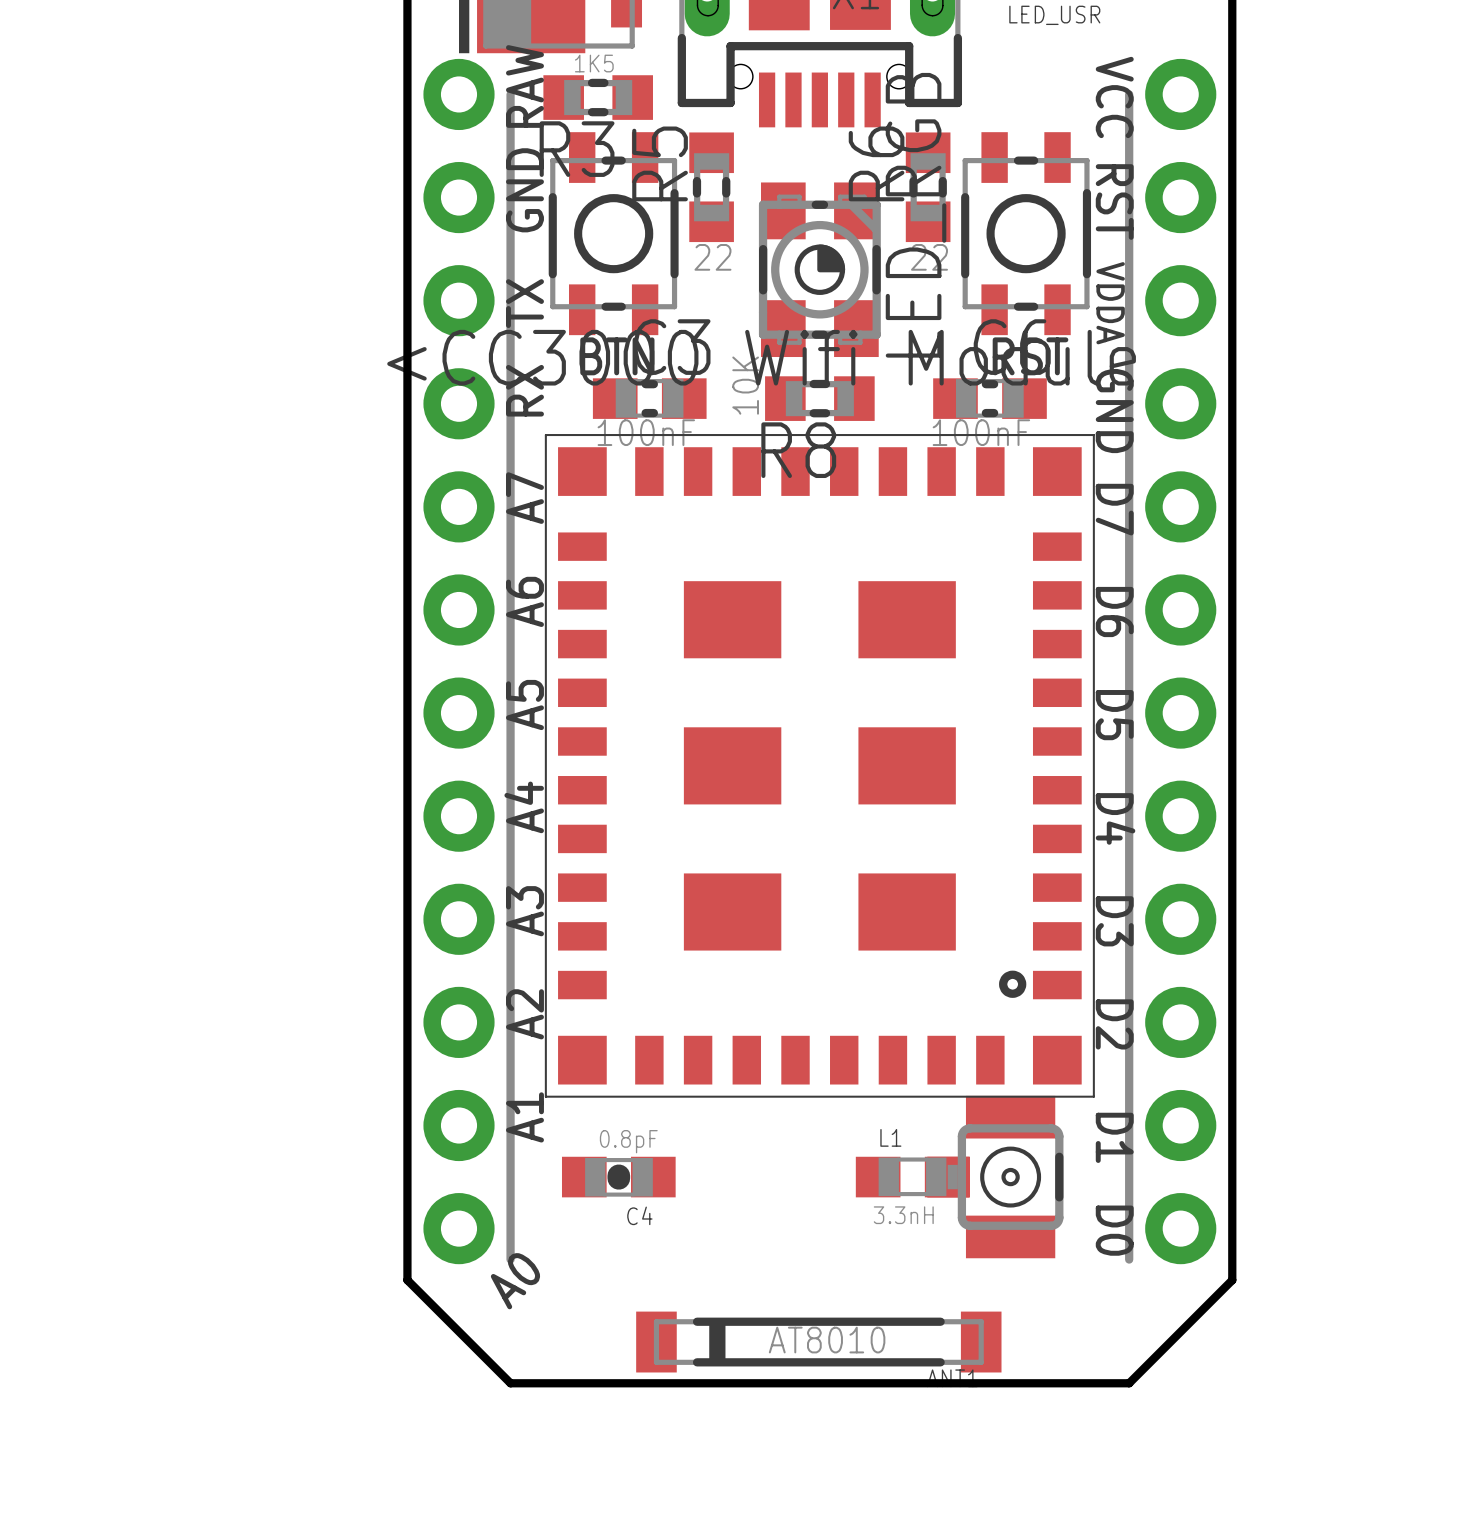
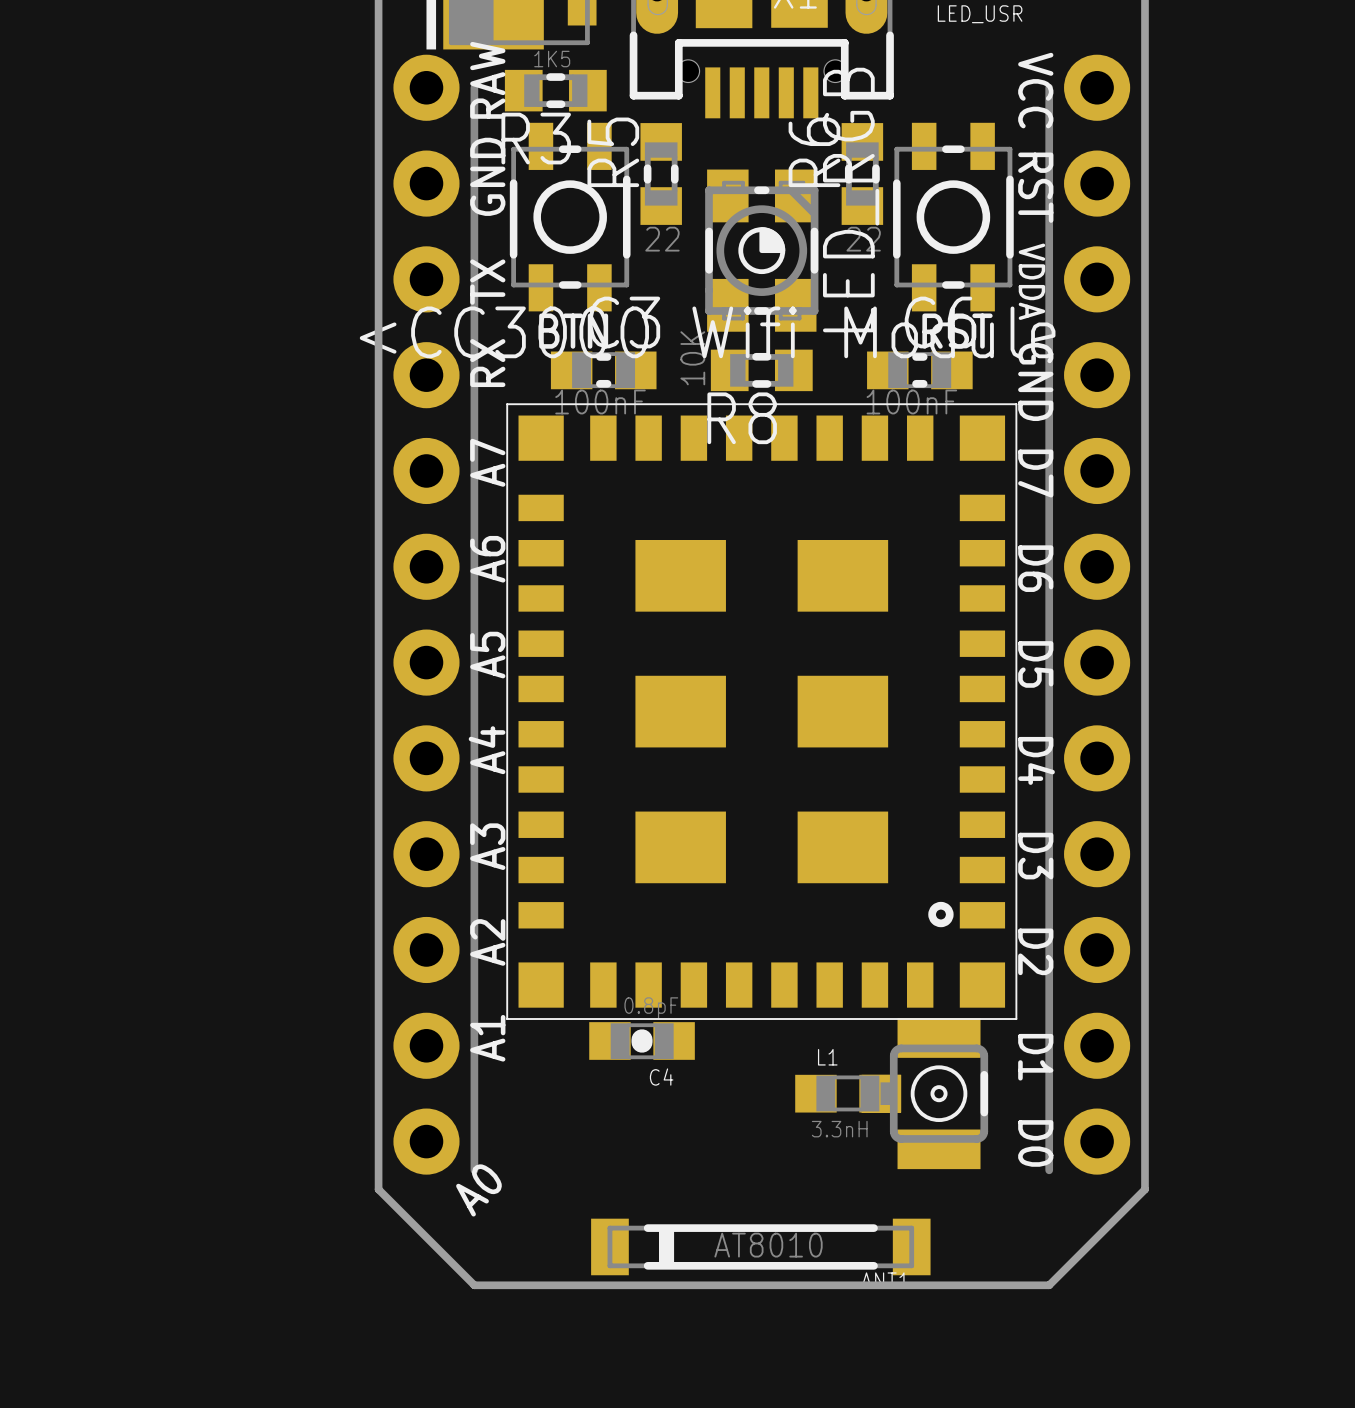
C4 position: (618, 1177) -> (642, 1040)

